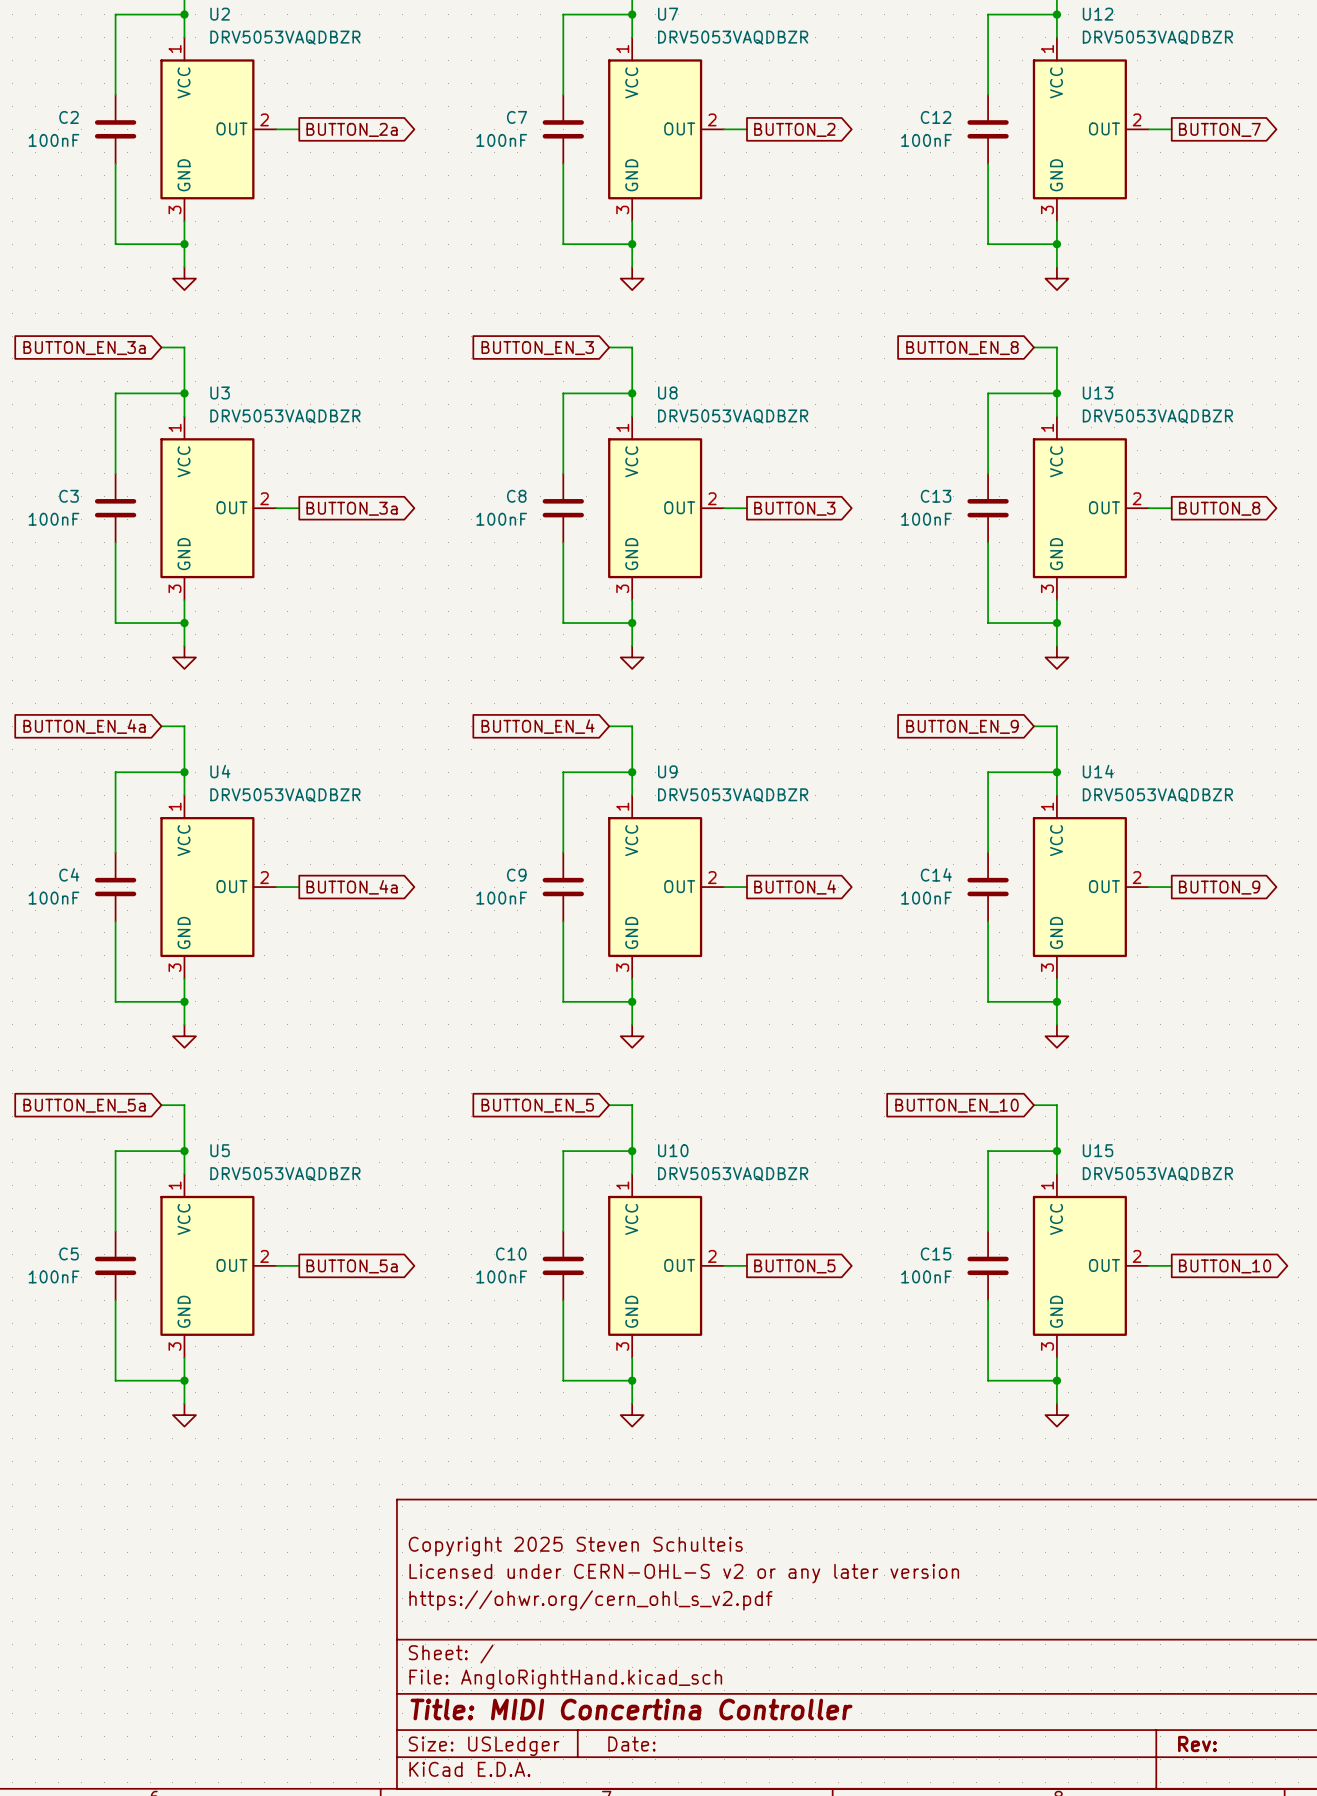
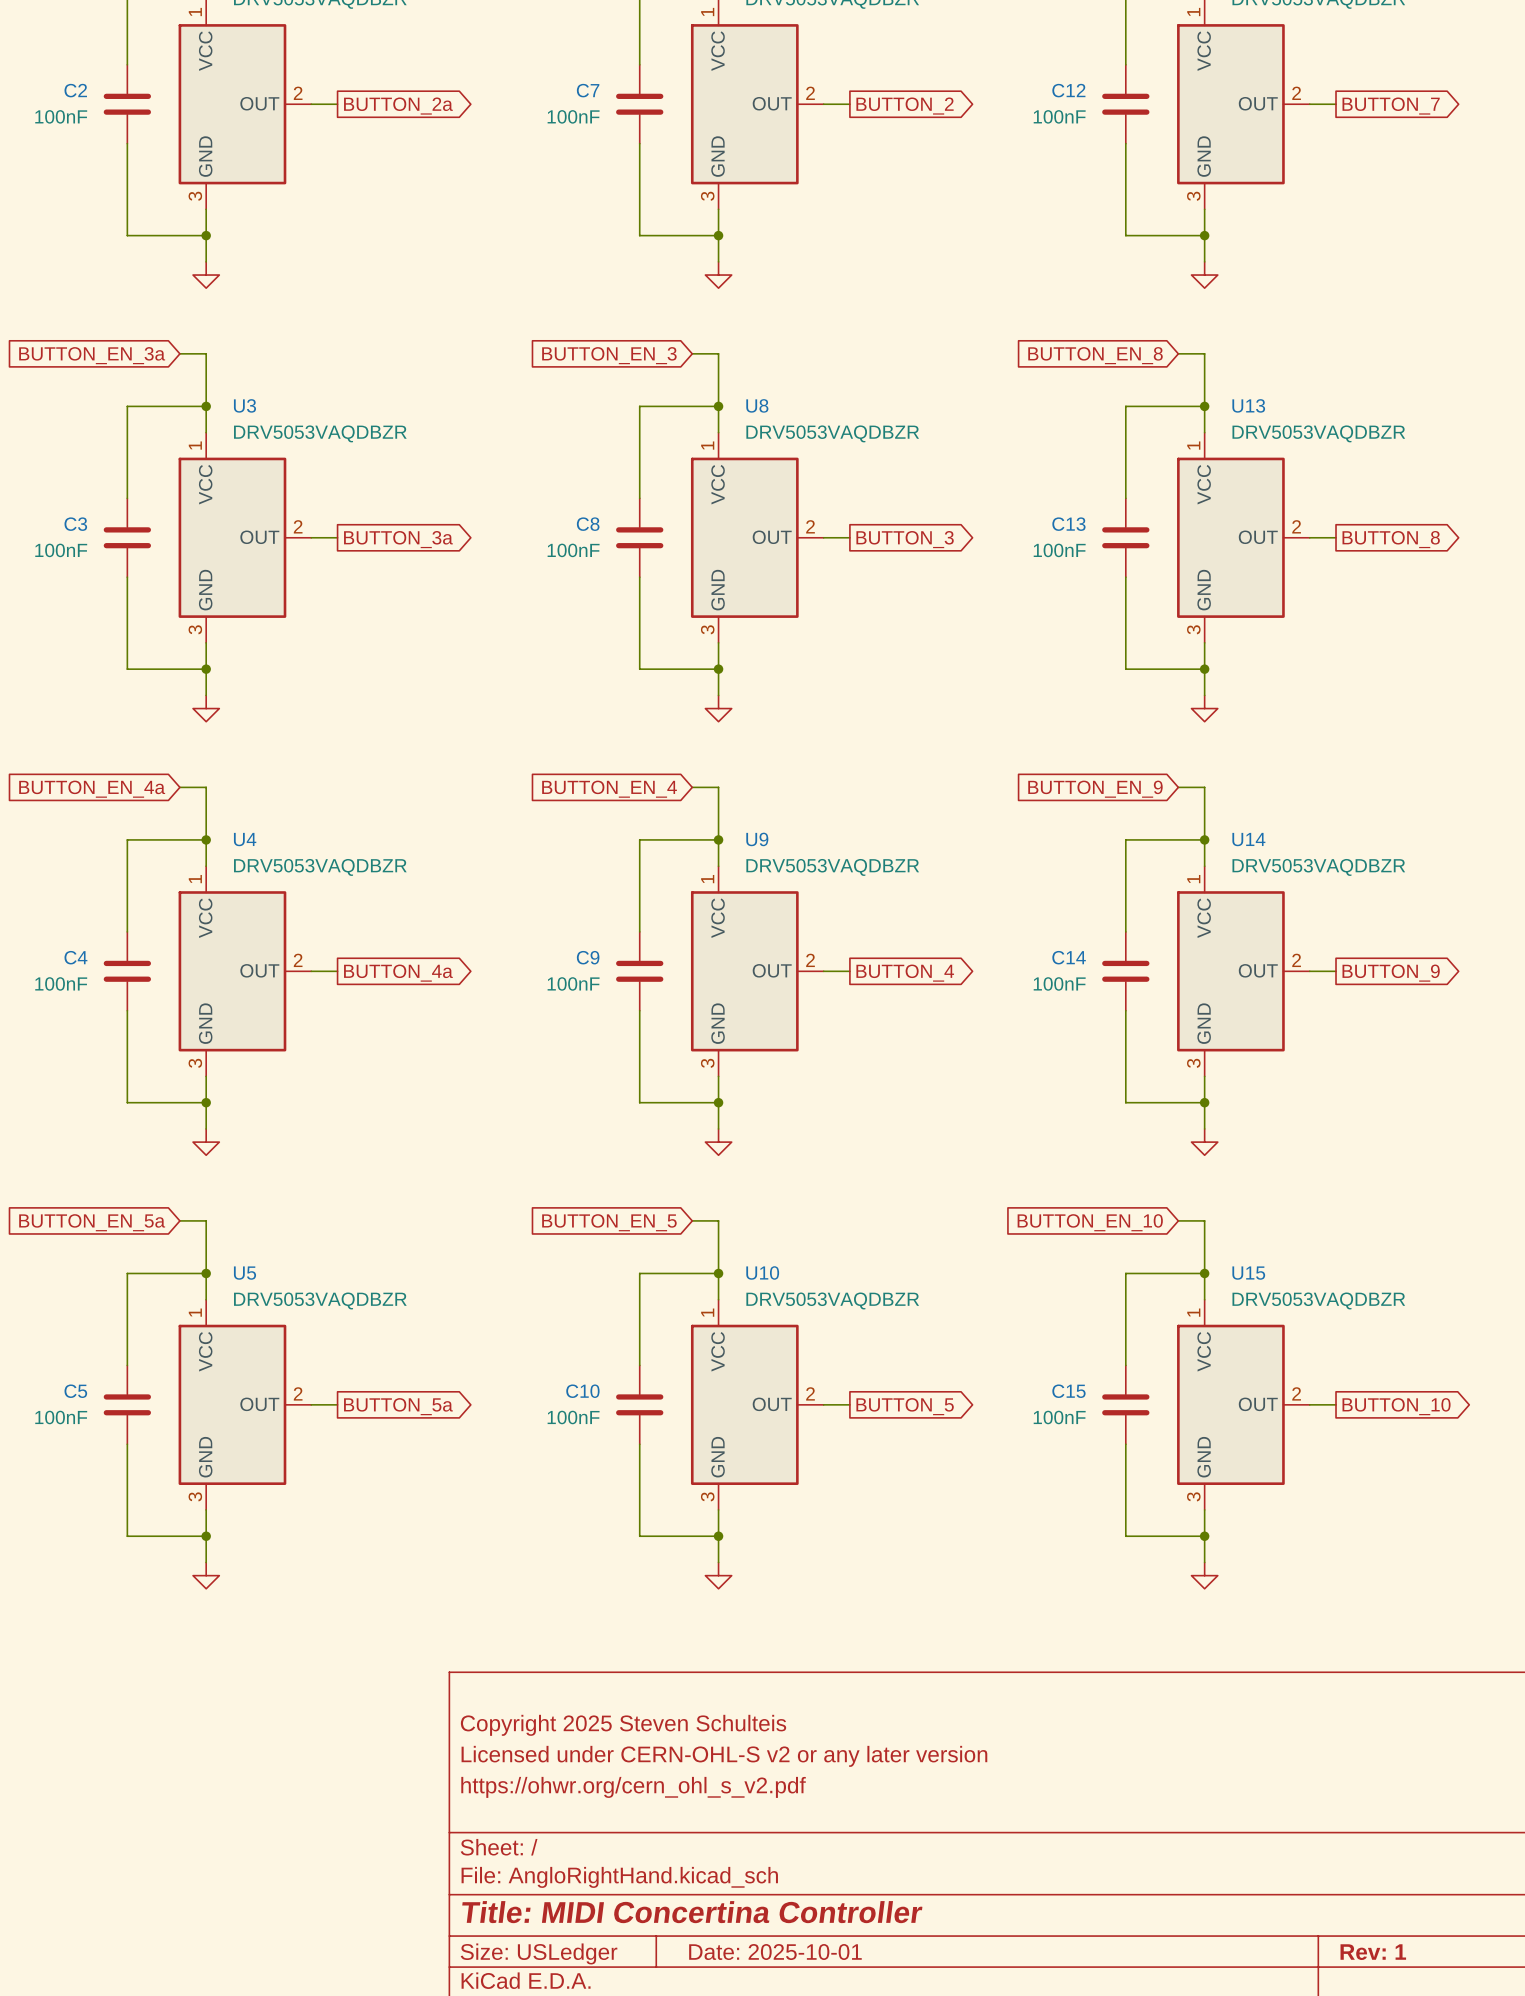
title block: Date: (631, 1744) -> Date: 2025-10-01 (775, 1952)
title block: Rev: (1197, 1744) -> Rev: 1 (1373, 1952)

